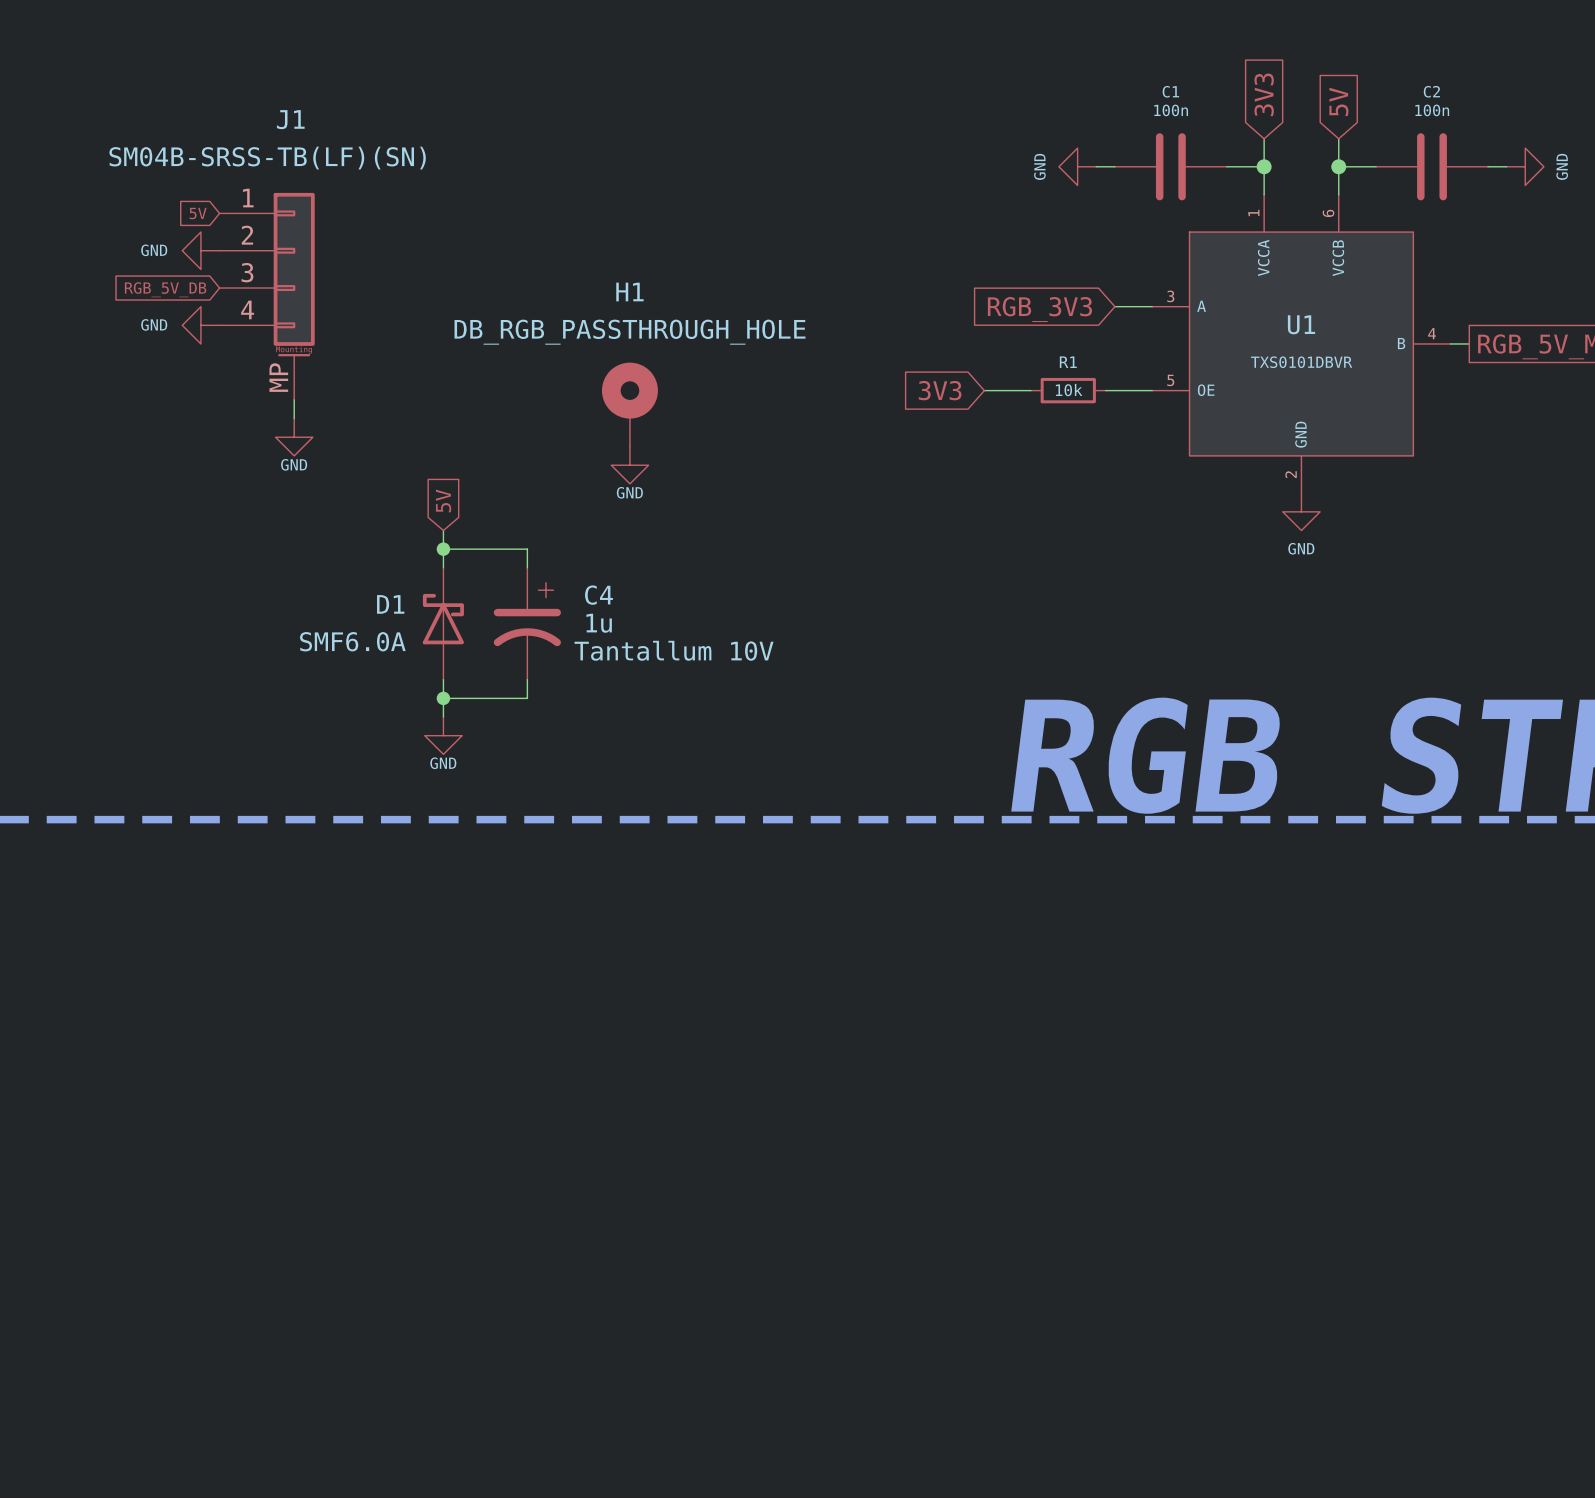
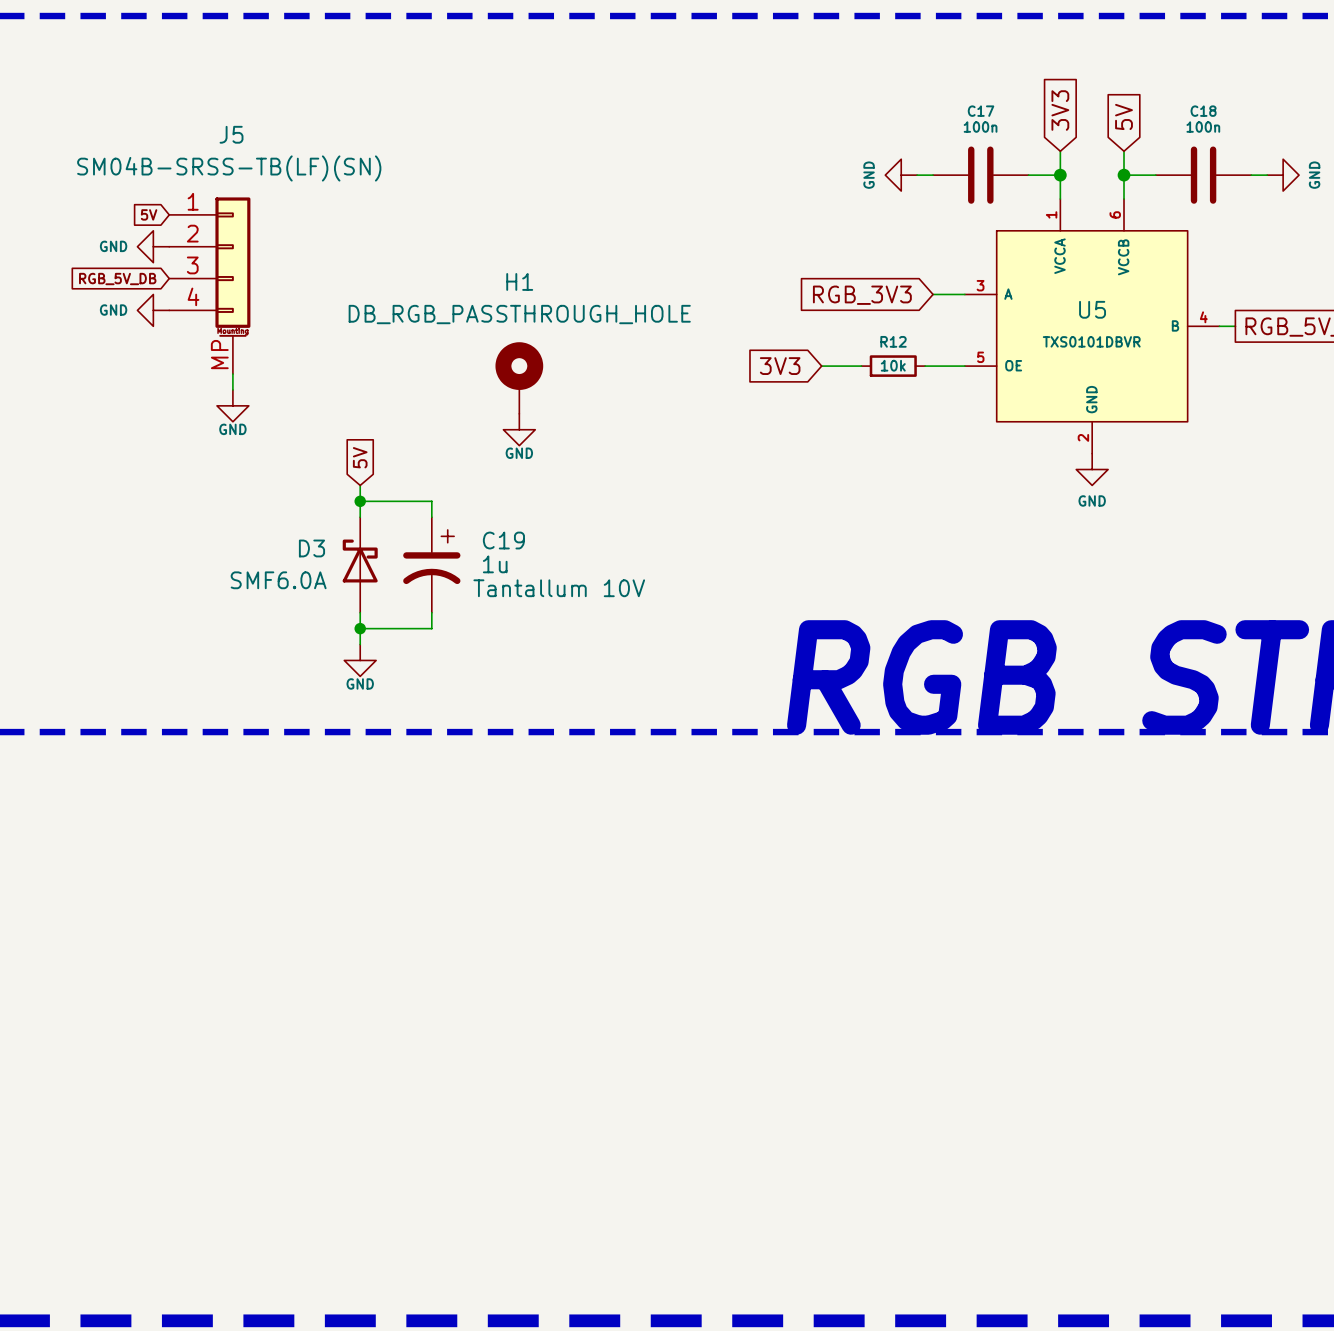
C1 name: C1 (1170, 91) -> C17 (981, 111)
C2 name: C2 (1431, 91) -> C18 (1203, 111)
J1 name: J1 (290, 119) -> J5 (231, 134)
U1 name: U1 (1301, 324) -> U5 (1092, 309)
R1 name: R1 (1068, 362) -> R12 (893, 341)
C4 name: C4 (598, 595) -> C19 (503, 540)
D1 name: D1 (390, 604) -> D3 (311, 548)

